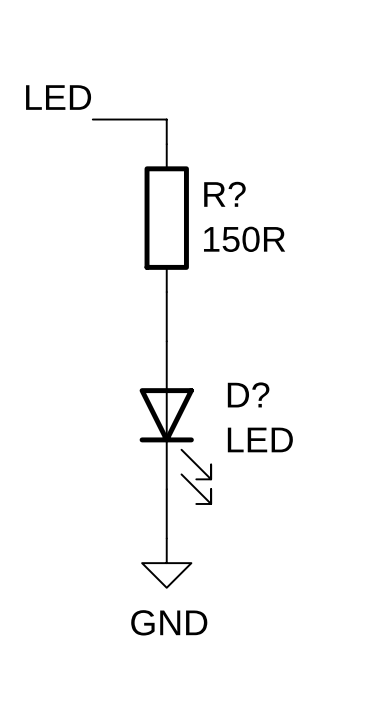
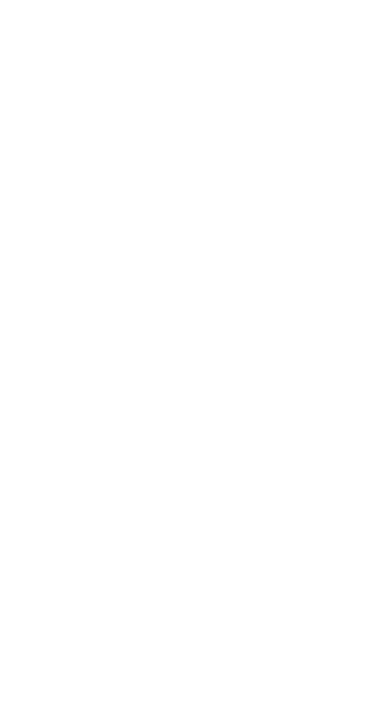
label: LED (58, 97) -> none
wire: (92, 119) (166, 119) (166, 144) -> none
R?: 150R (166, 218) -> none
wire: (166, 292) (166, 341) -> none
D?: LED (175, 422) -> none
wire: (166, 489) (166, 538) -> none
power symbol: GND (166, 563) -> none

